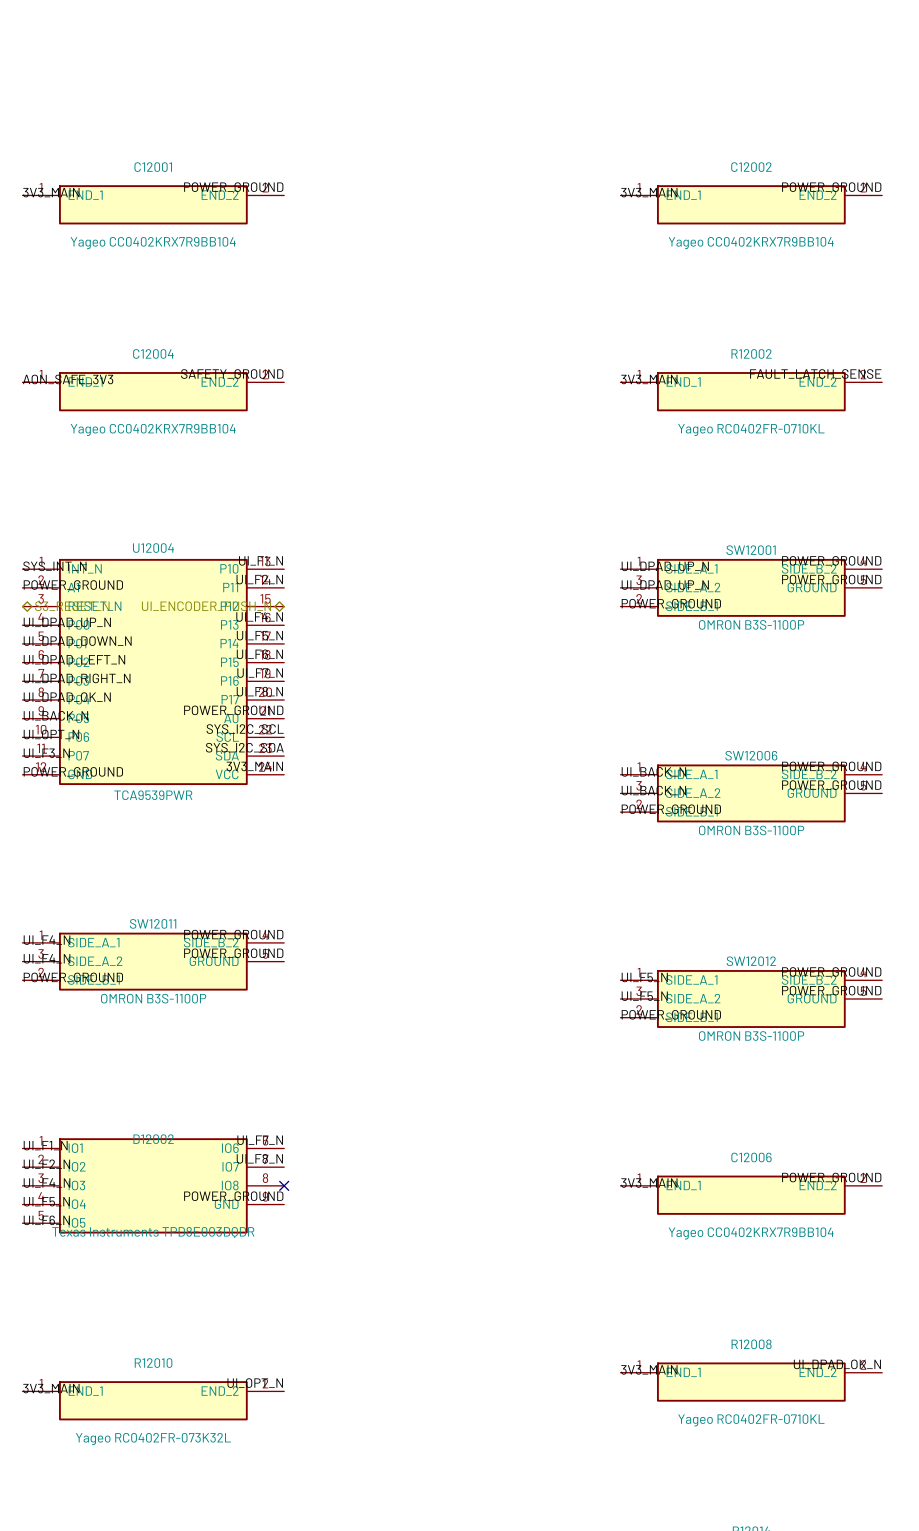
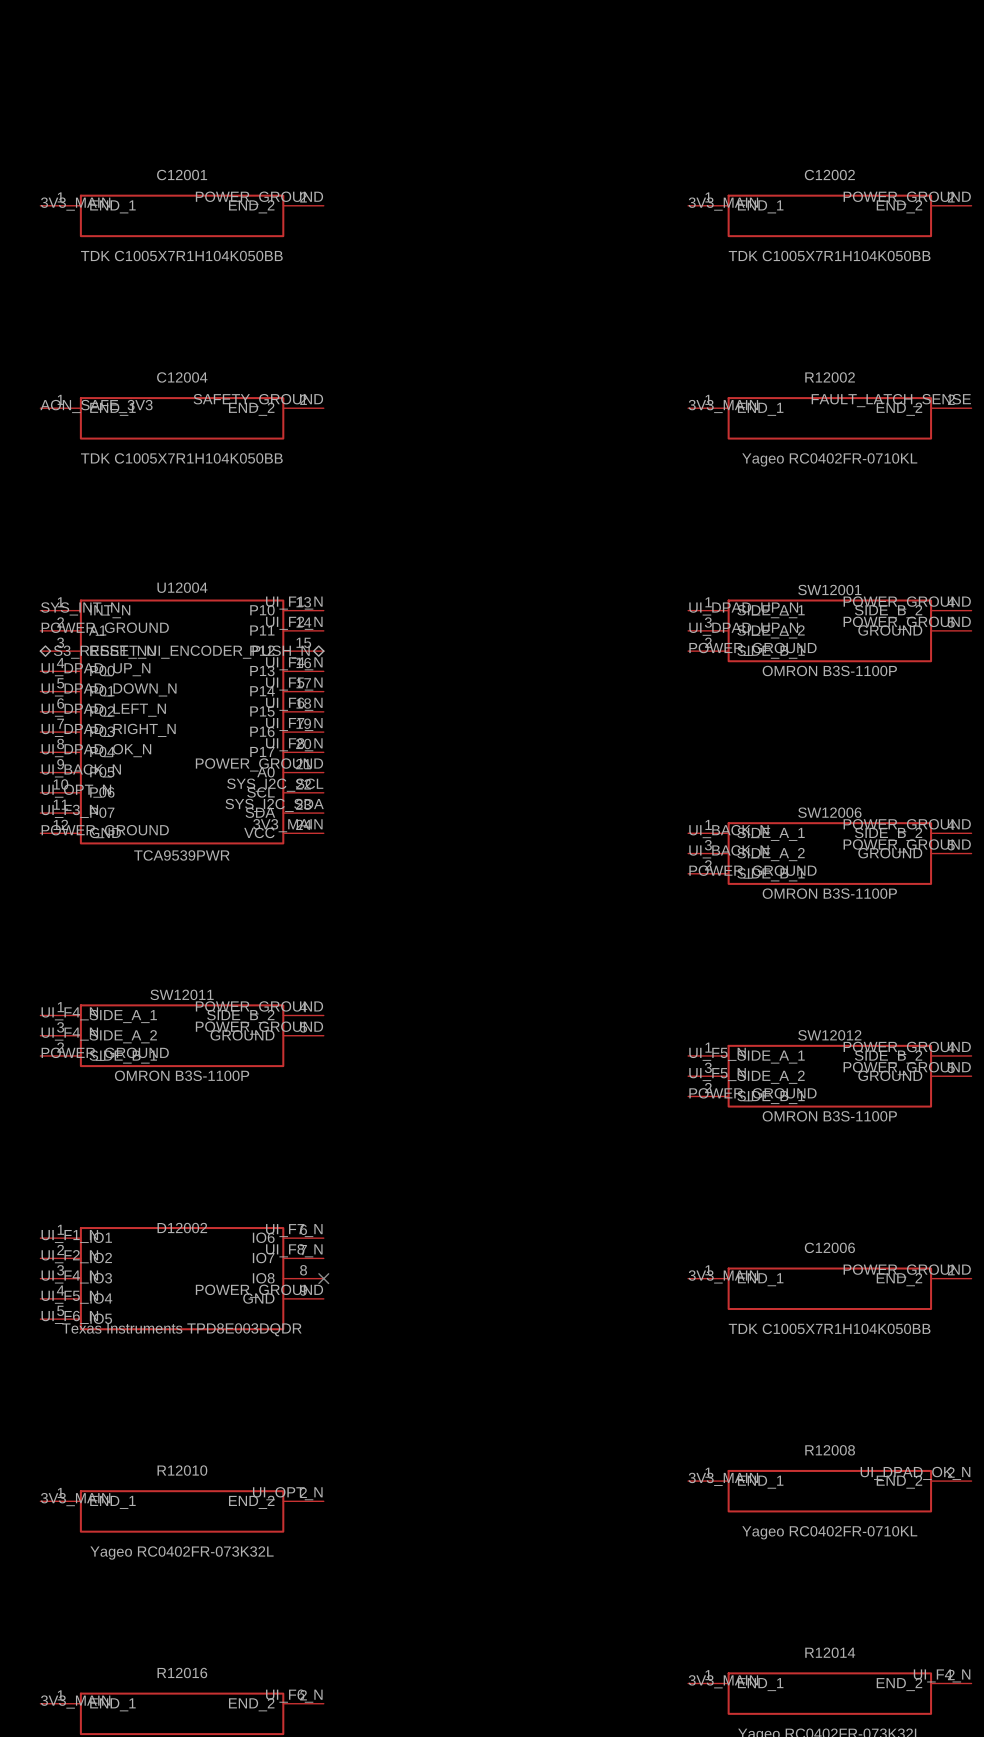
C12001 value: Yageo CC0402KRX7R9BB104 (153, 243) -> TDK C1005X7R1H104K050BB (181, 256)
C12002 value: Yageo CC0402KRX7R9BB104 (751, 243) -> TDK C1005X7R1H104K050BB (829, 256)
C12004 value: Yageo CC0402KRX7R9BB104 (153, 429) -> TDK C1005X7R1H104K050BB (181, 458)
C12006 value: Yageo CC0402KRX7R9BB104 (751, 1233) -> TDK C1005X7R1H104K050BB (829, 1328)

